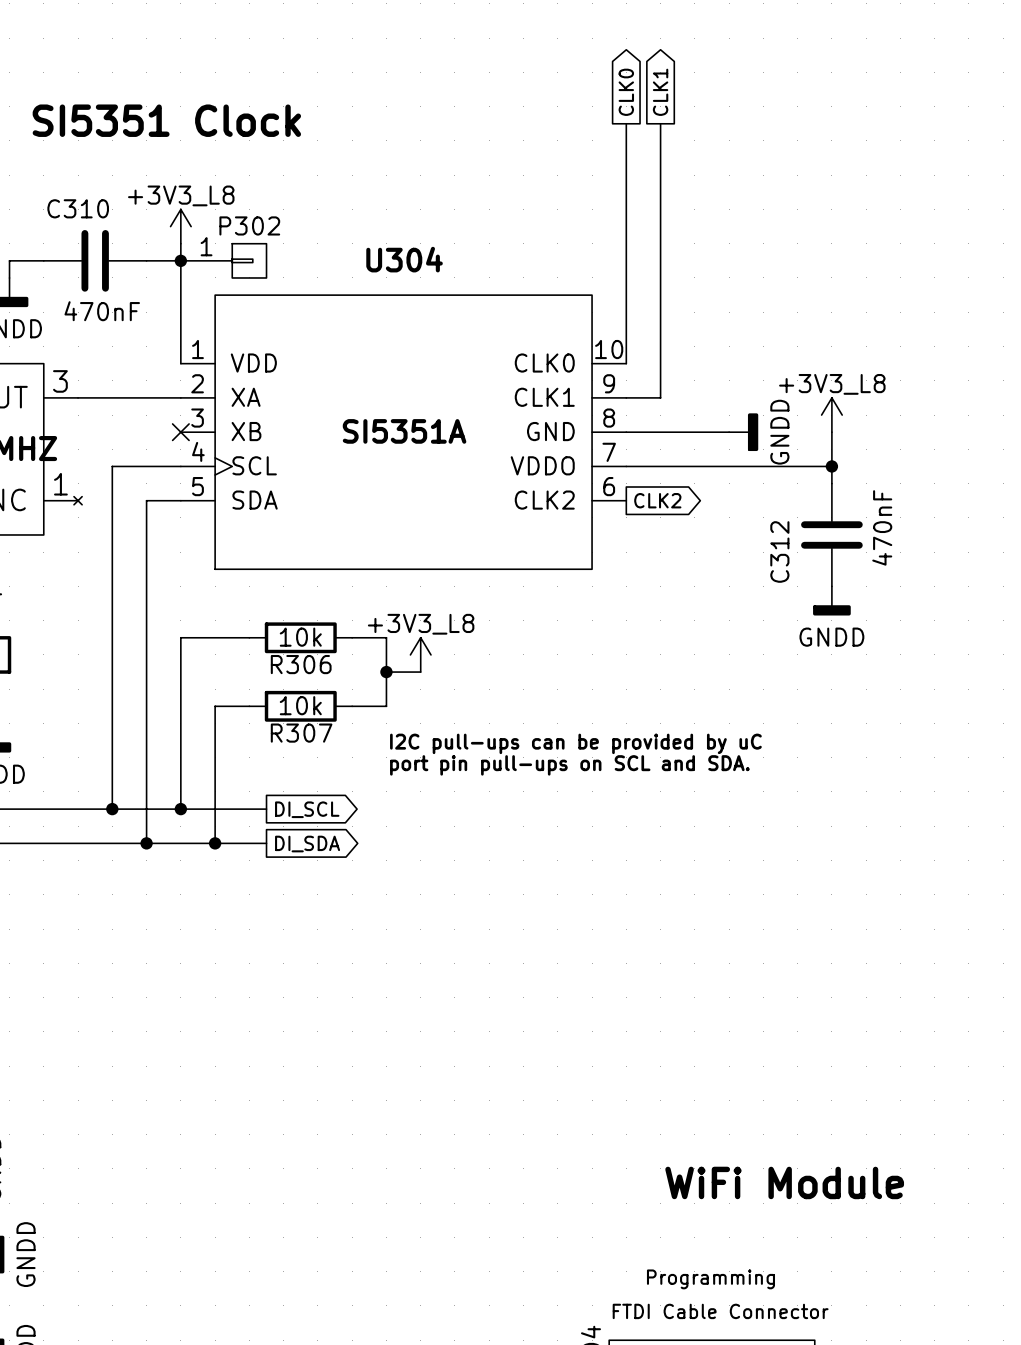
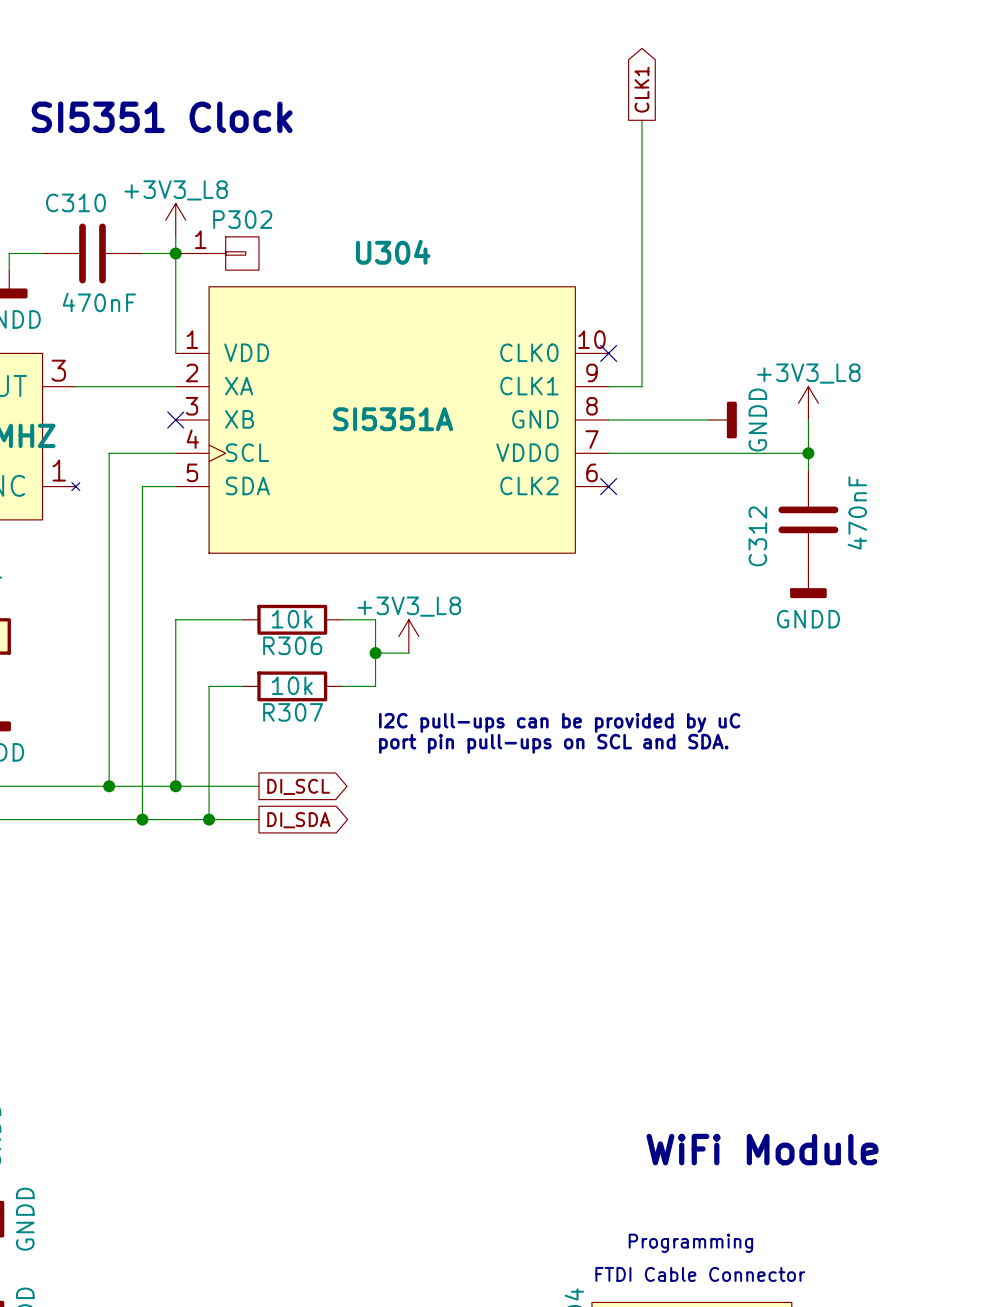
global label: CLK0 (626, 92) -> none
wire: (626, 123) (626, 363) -> none
no-connect mark: none -> (608, 353)
no-connect mark: none -> (608, 486)
global label: CLK2 (657, 500) -> none

